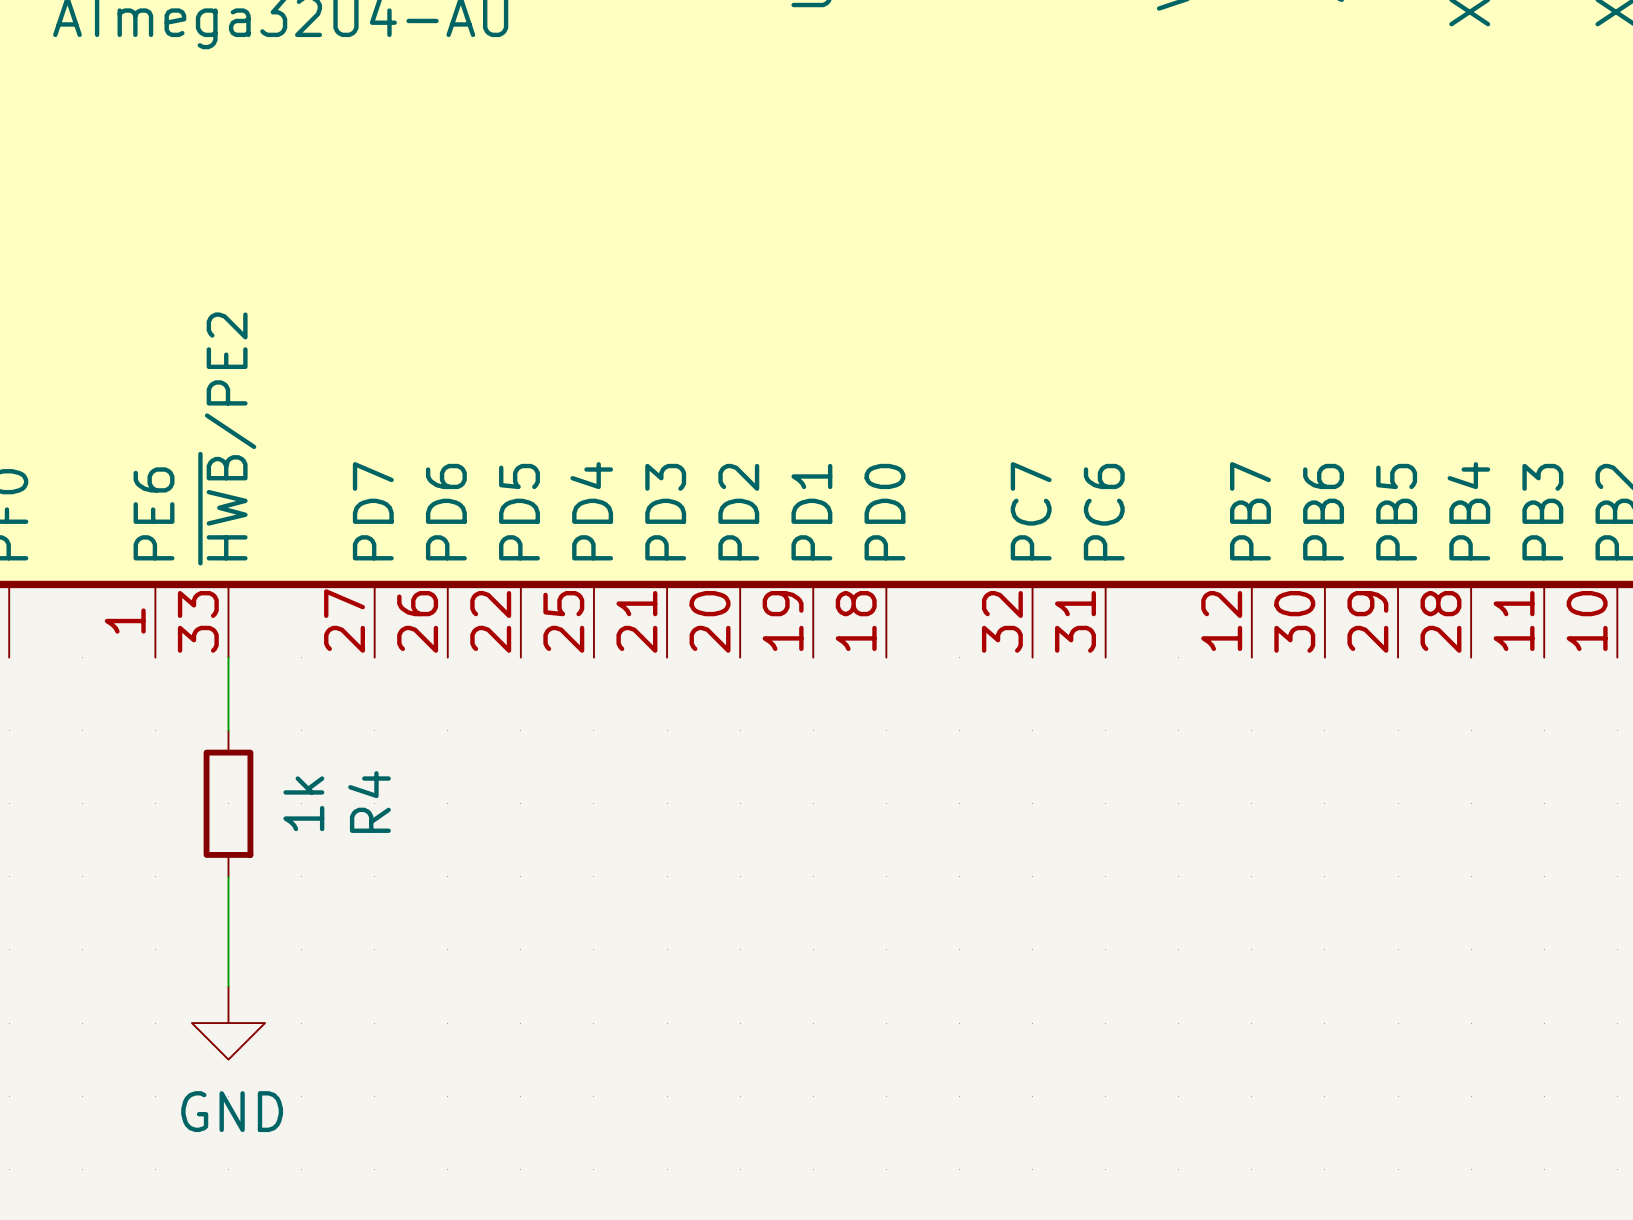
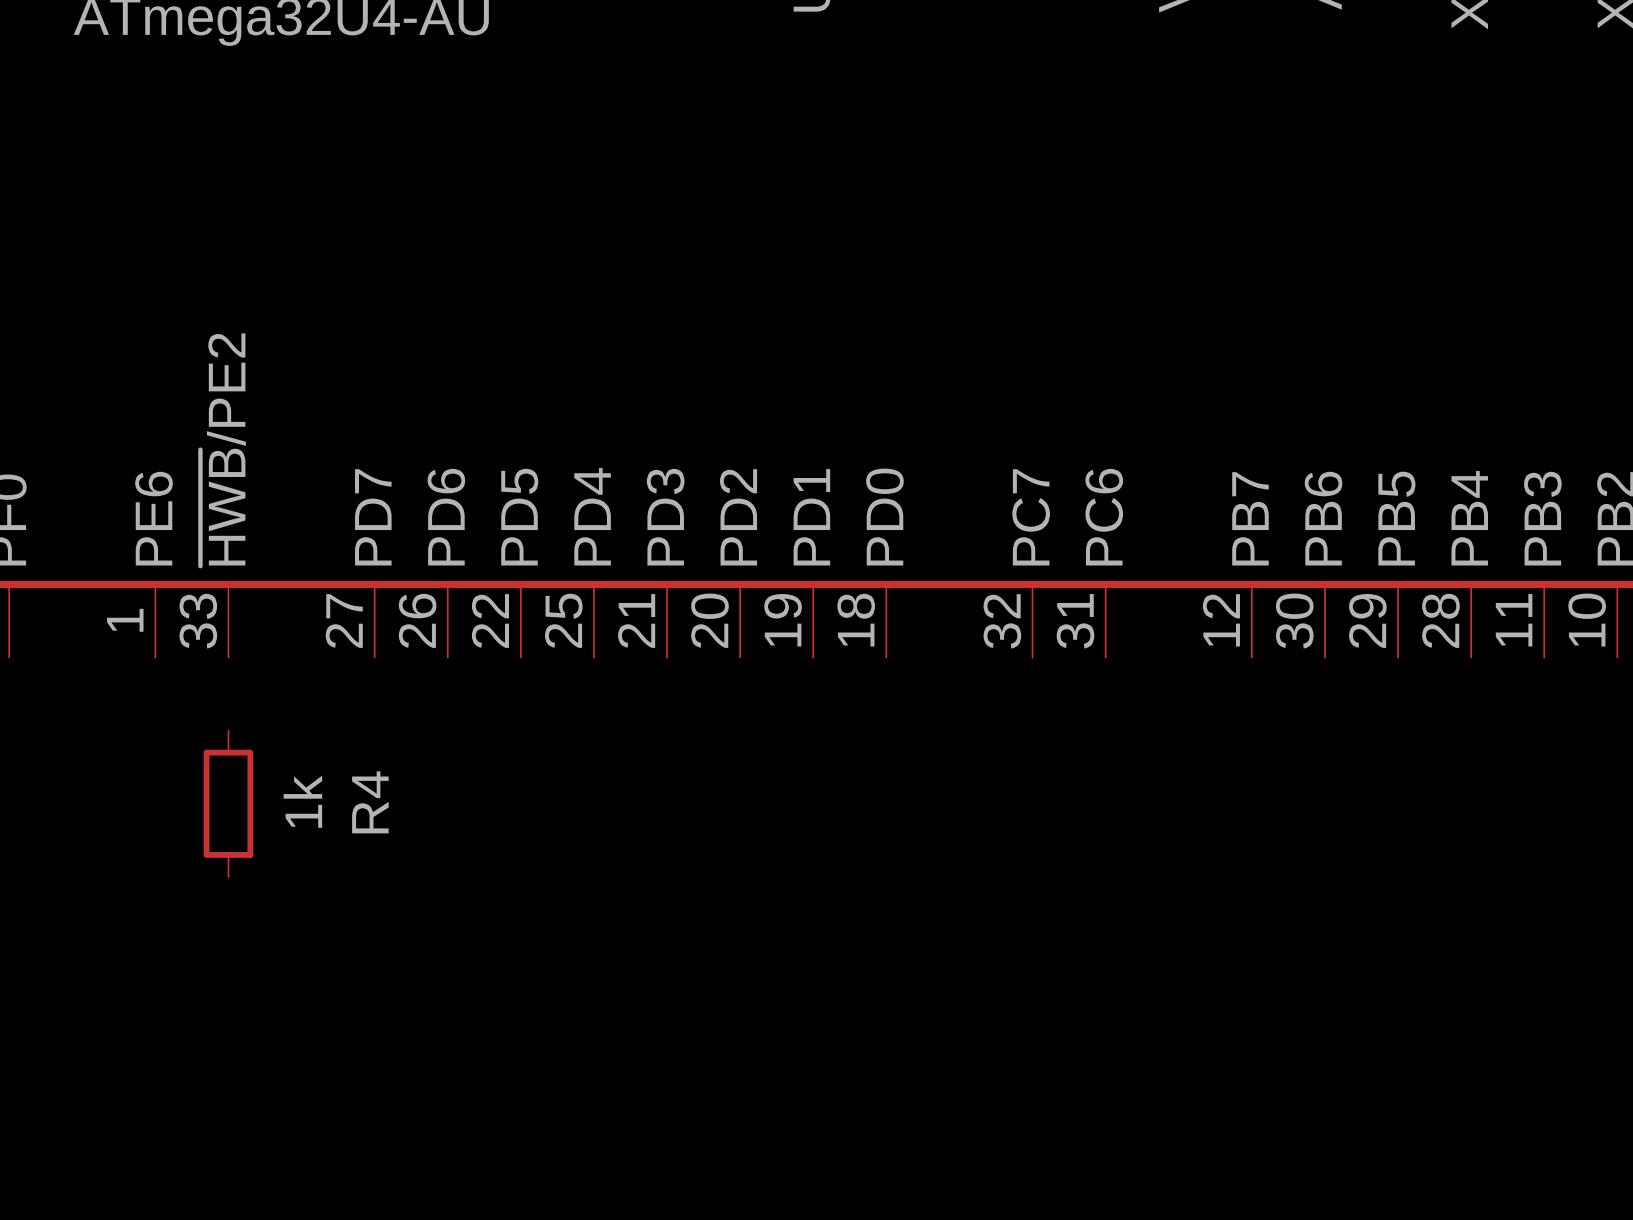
wire: (228, 657) (228, 730) -> none
wire: (228, 876) (228, 986) -> none
power symbol: GND (228, 1023) -> none

